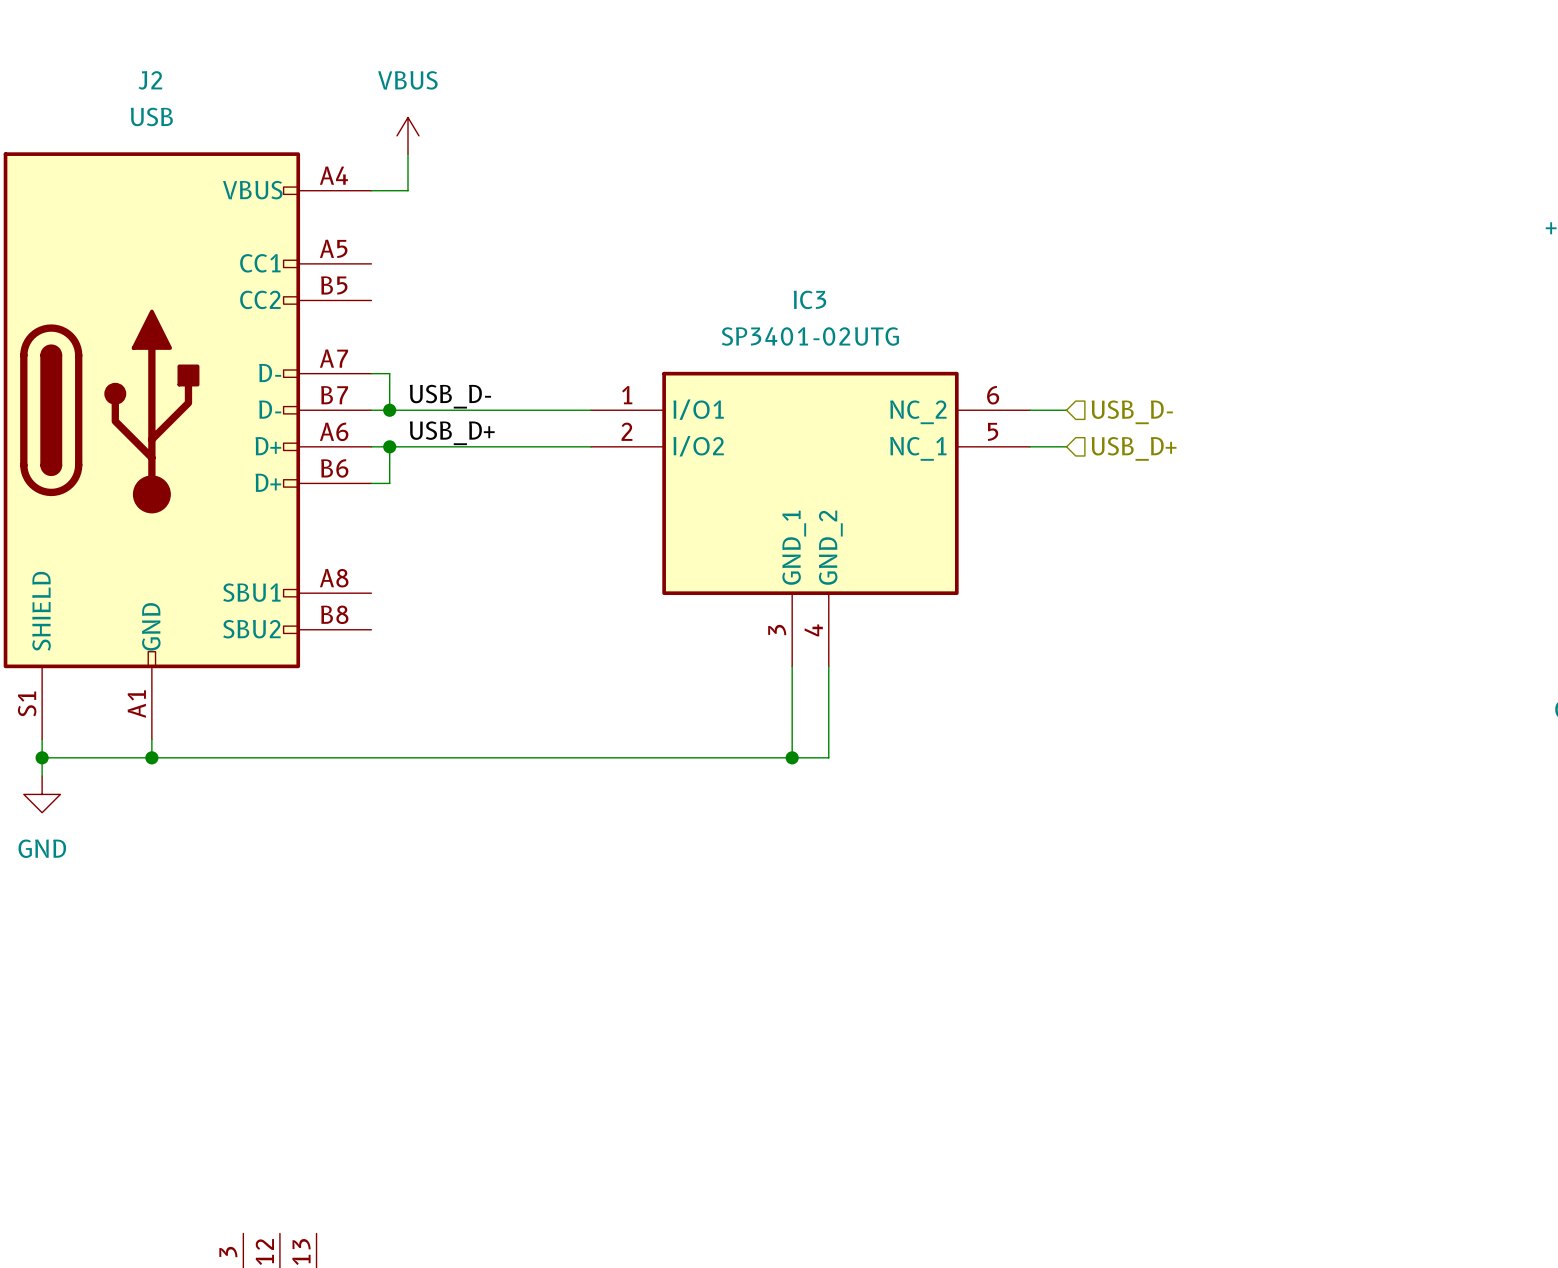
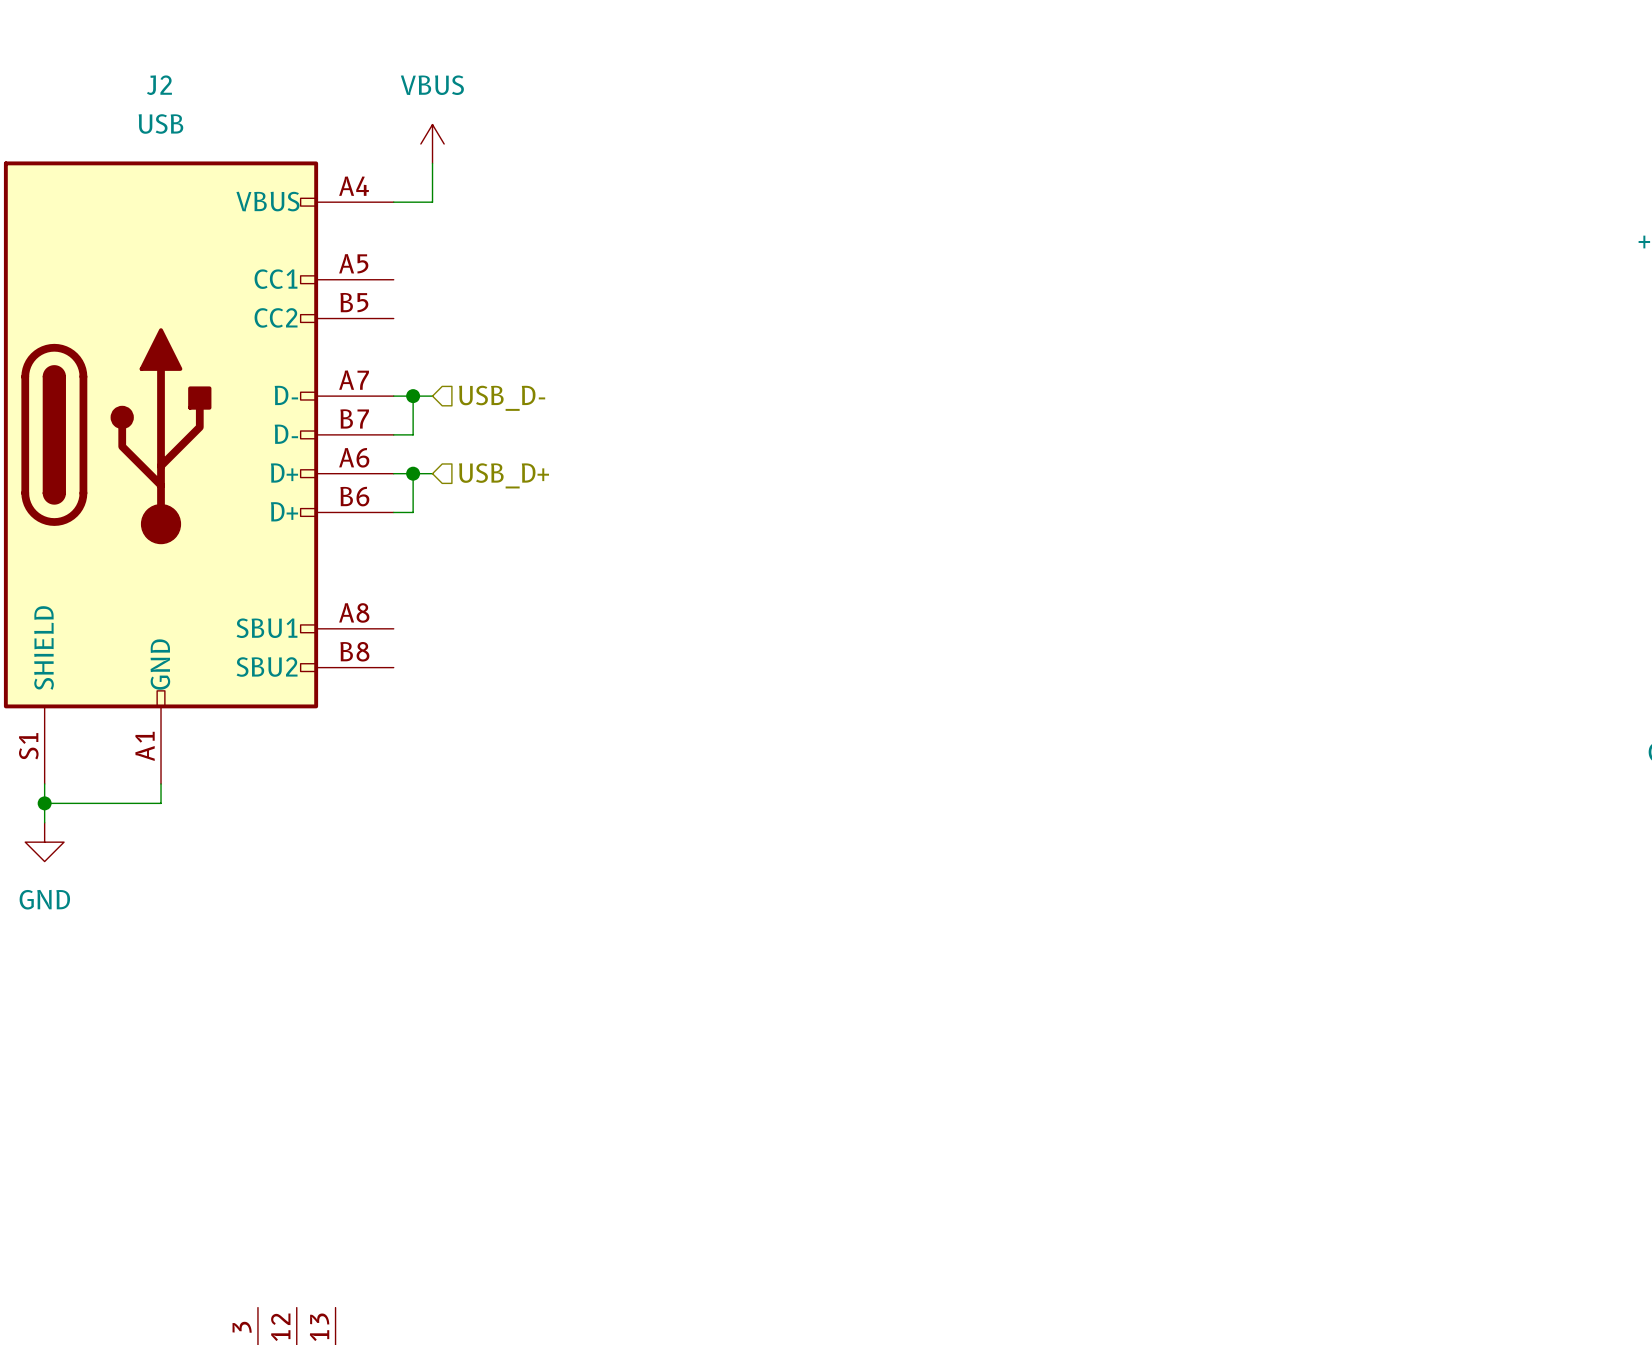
wire: none -> (413, 396) (432, 396)
hierarchical label: none -> USB_D- (502, 398)
label: USB_D- (450, 396) -> none
wire: (389, 410) (590, 410) -> none
junction position: (389, 410) -> (413, 396)
wire: (1030, 410) (1066, 410) -> none
hierarchical label: USB_D- (1132, 412) -> none
label: USB_D+ (452, 433) -> none
wire: (408, 446) (590, 446) -> none
wire: (1030, 446) (1066, 446) -> none
hierarchical label: none -> USB_D+ (504, 475)
hierarchical label: USB_D+ (1134, 448) -> none
IC3: SP3401-02UTG (810, 519) -> none
wire: (792, 666) (792, 757) -> none
wire: (828, 666) (828, 757) (151, 757) -> none
junction: (151, 757) -> none
junction: (792, 757) -> none

